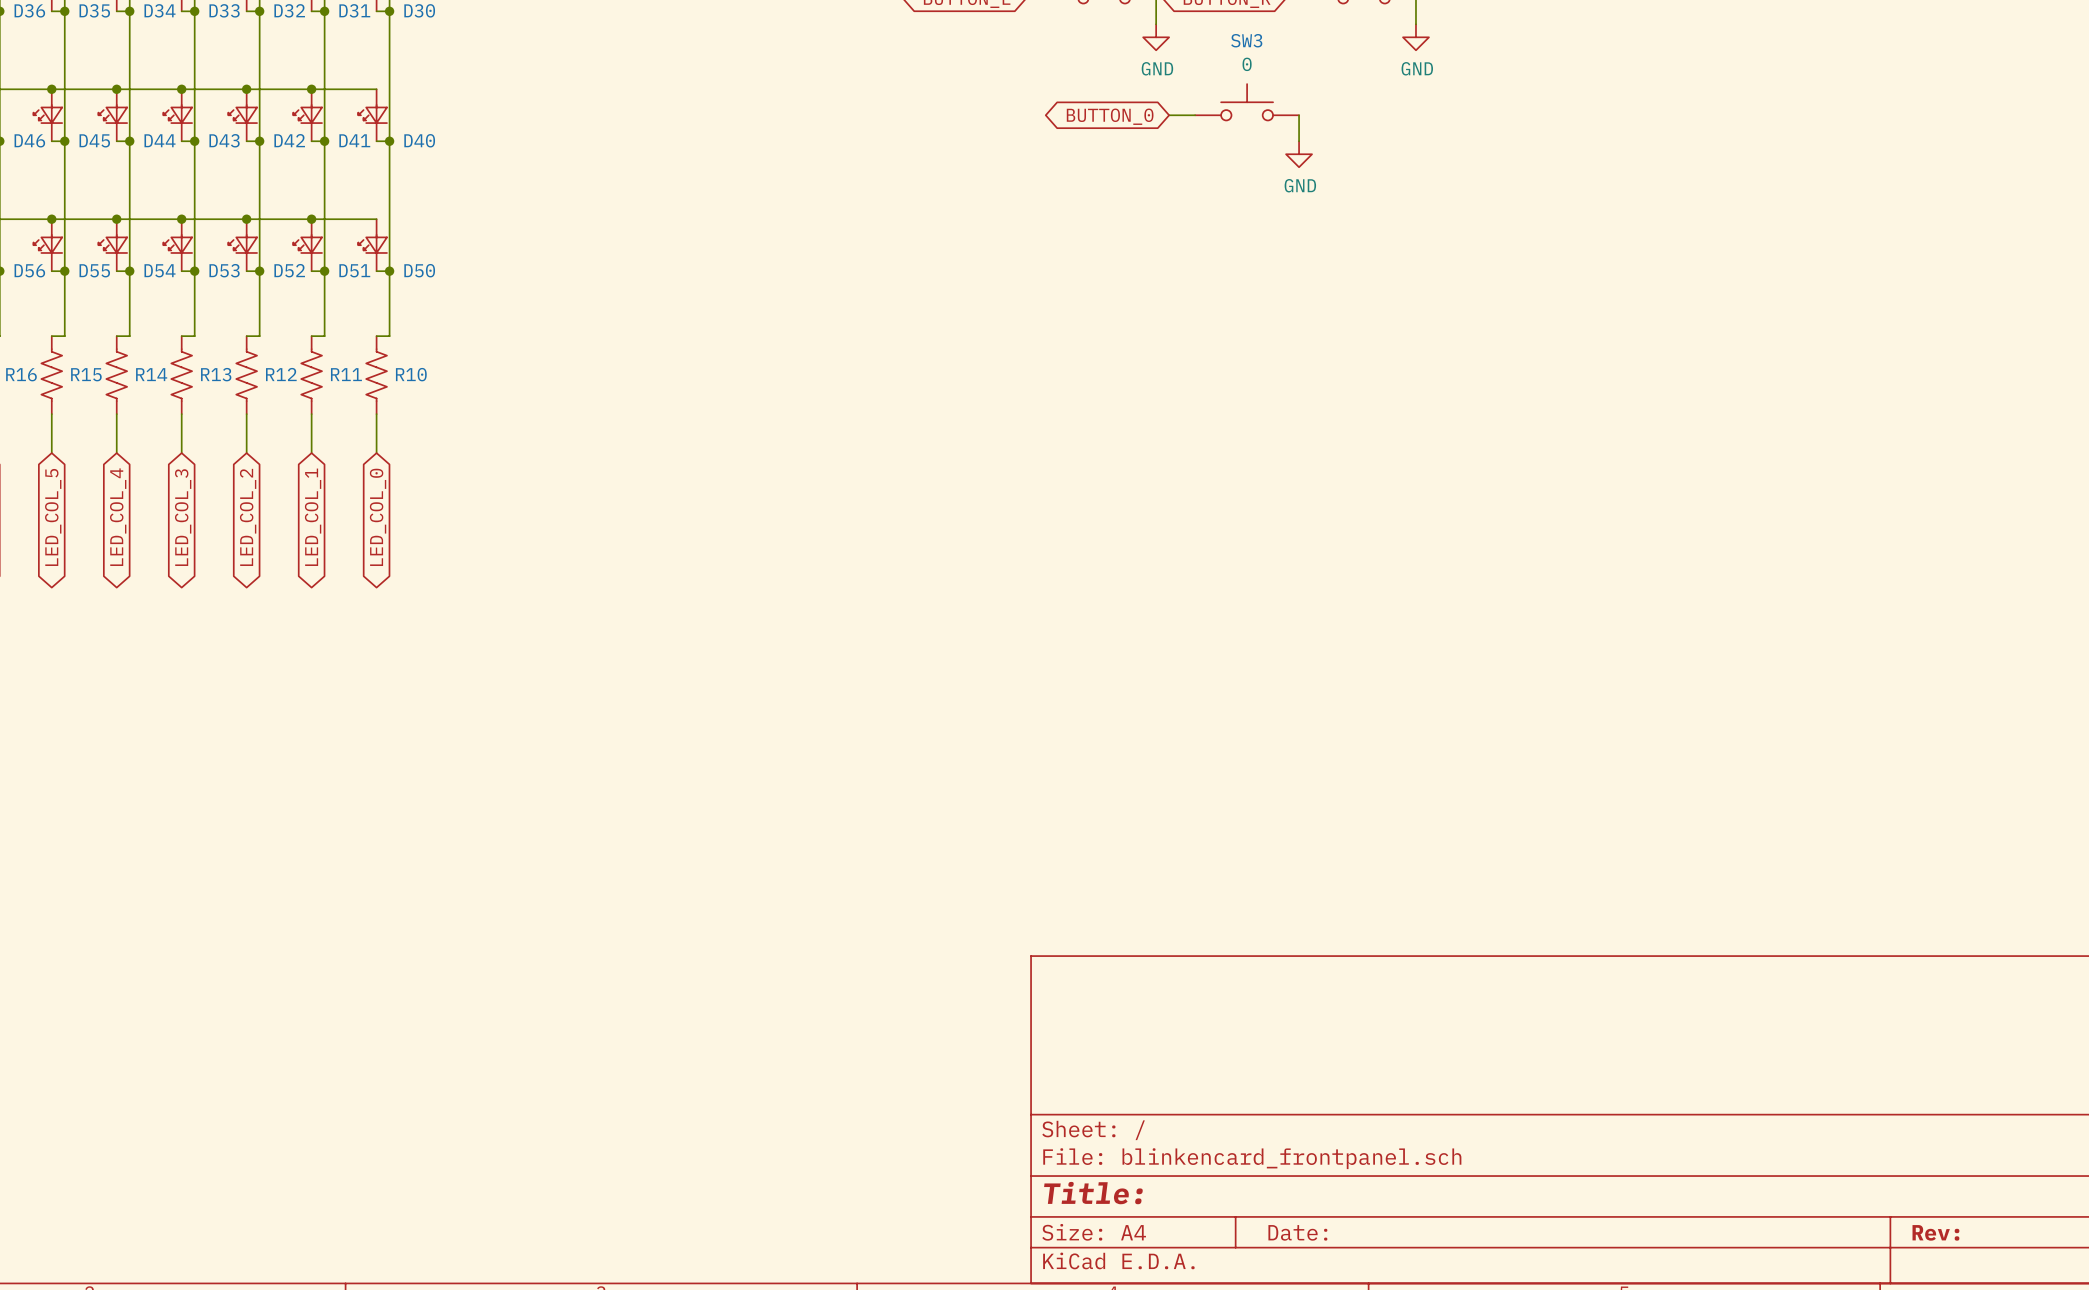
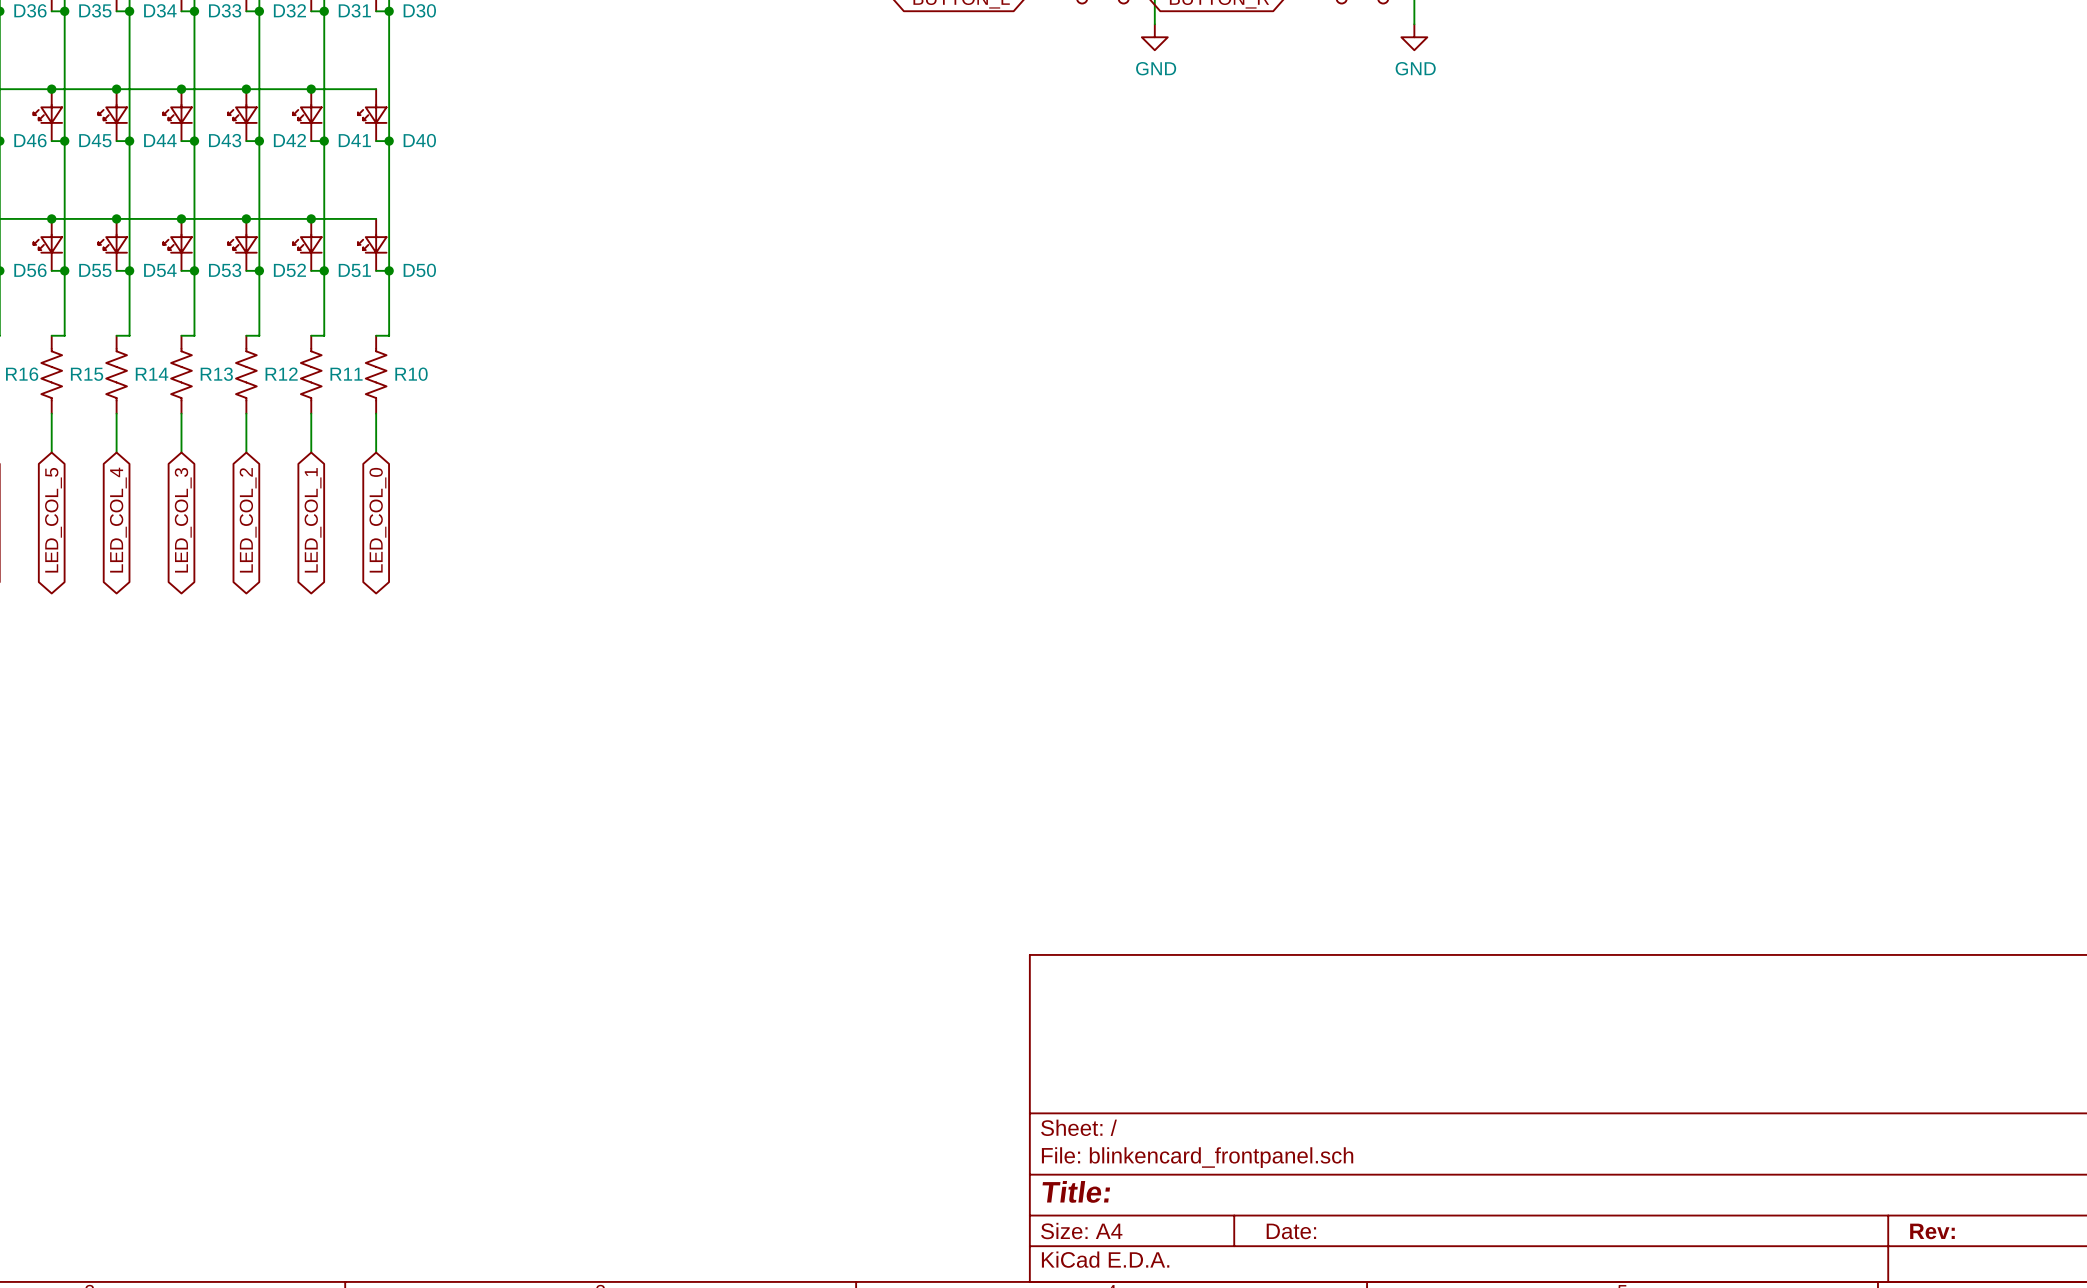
SW3: 0 (1247, 102) -> none
wire: (1169, 115) (1195, 115) -> none
wire: (1299, 115) (1299, 141) -> none
global label: BUTTON_0 (1110, 116) -> none
power symbol: GND (1299, 154) -> none

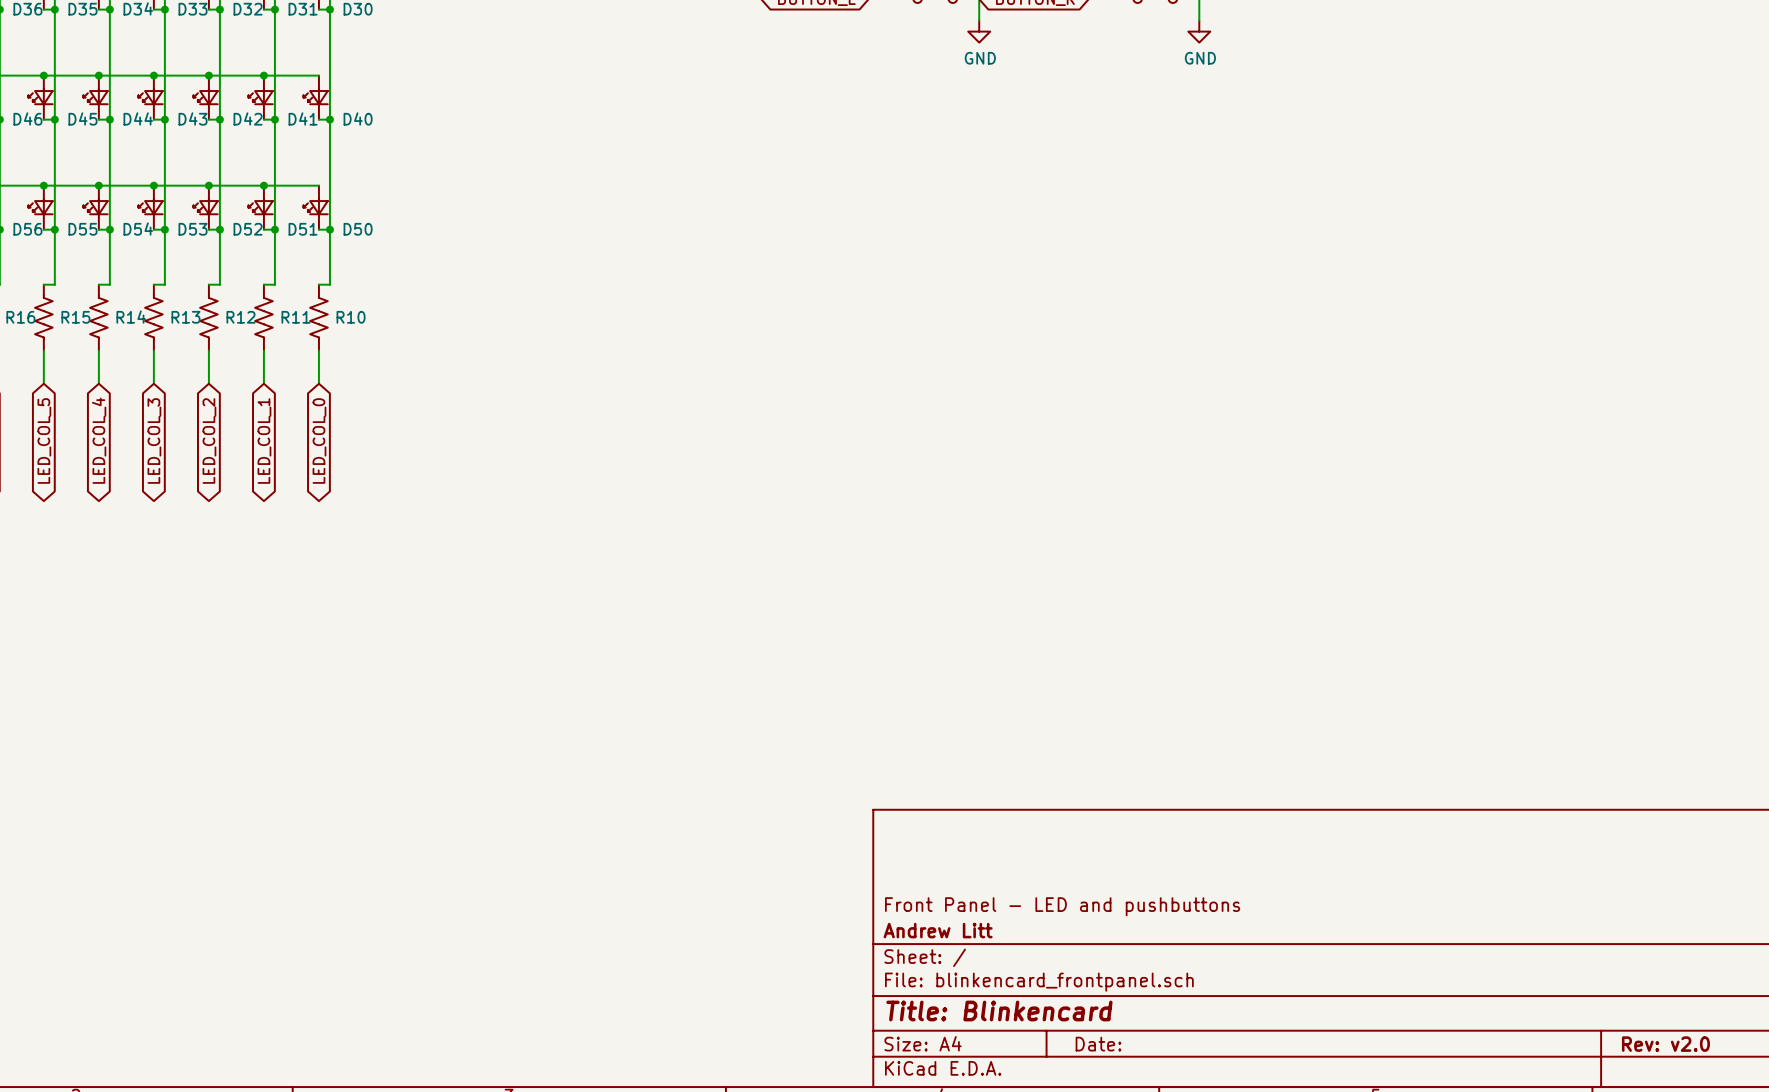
title block: none -> Front Panel - LED and pushbuttons (1062, 906)
title block: none -> Andrew Litt (938, 930)
title block: Title: (1076, 1191) -> Title: Blinkencard (999, 1011)
title block: Rev: (1932, 1231) -> Rev: v2.0 (1665, 1044)

